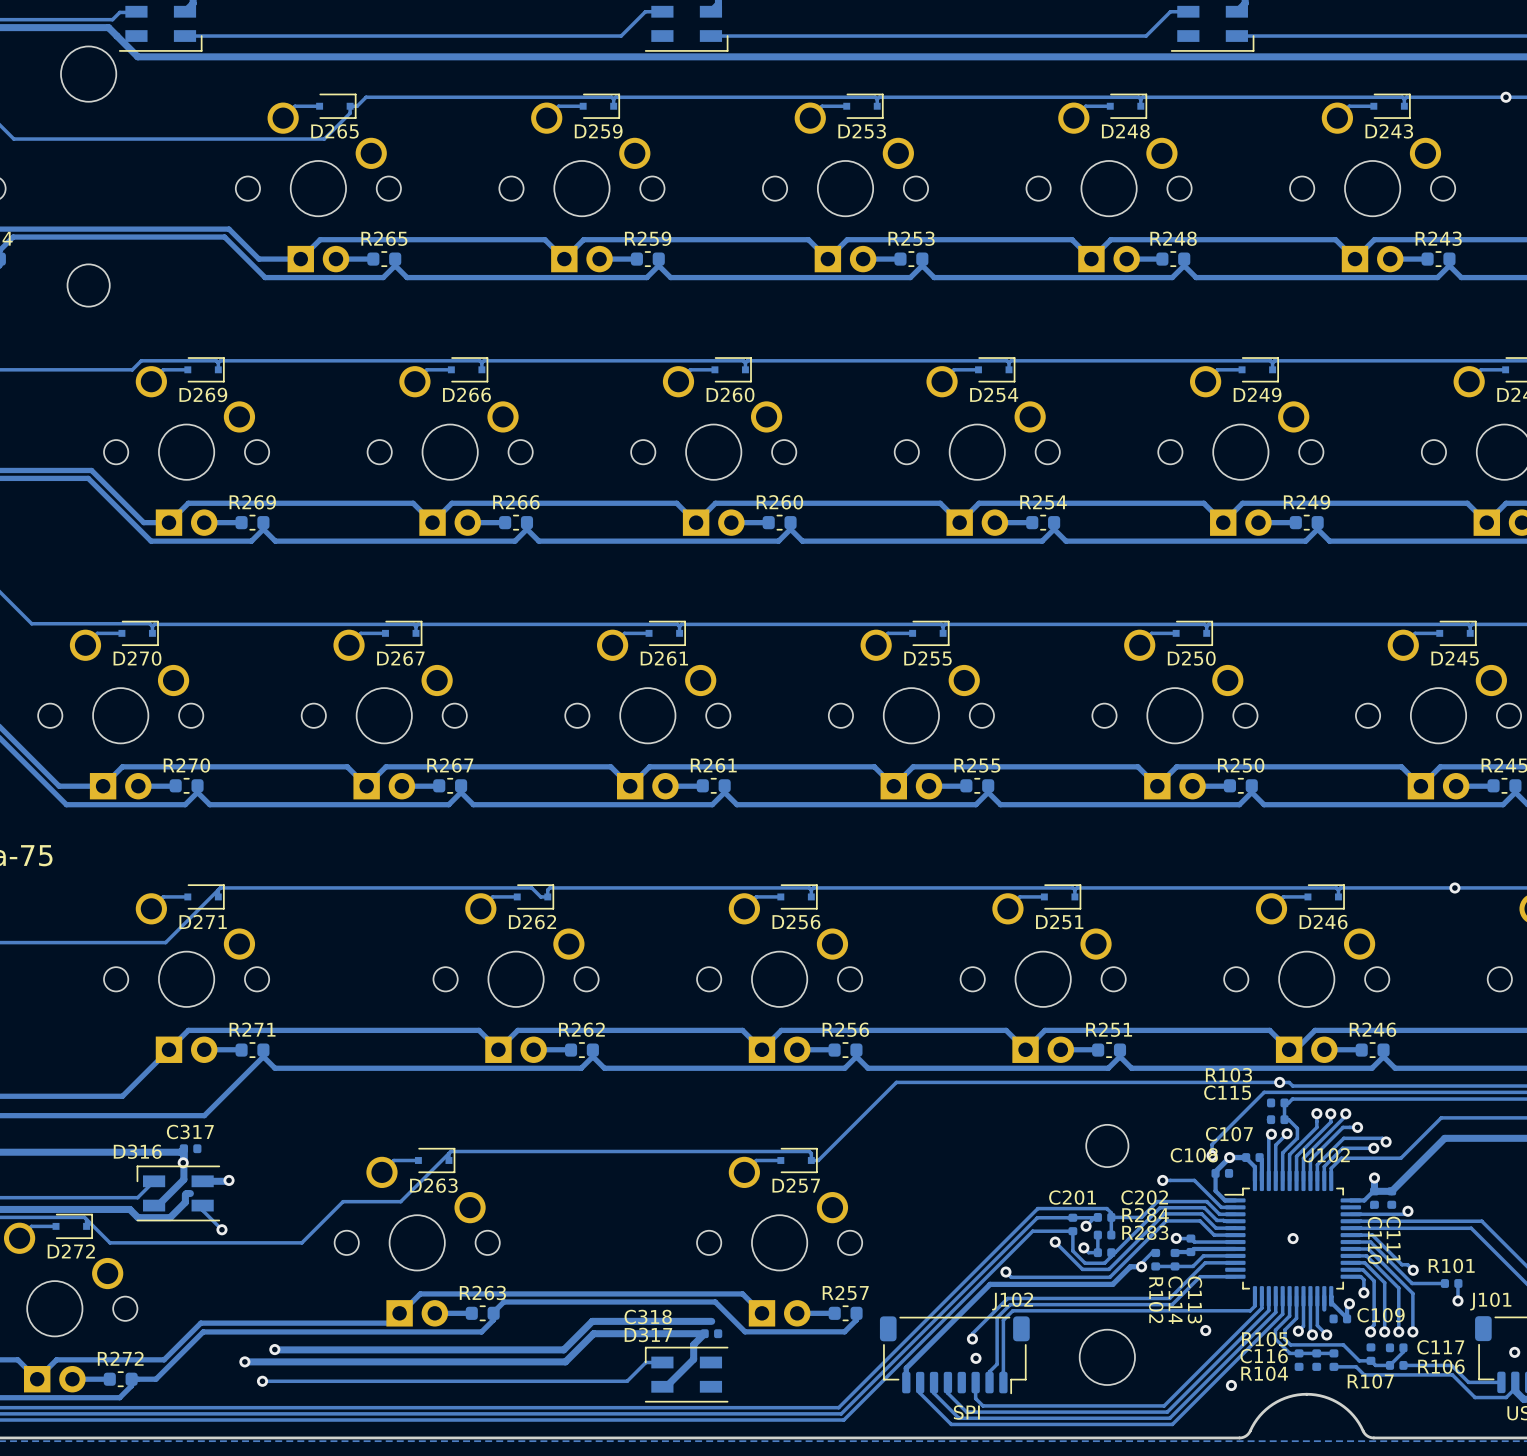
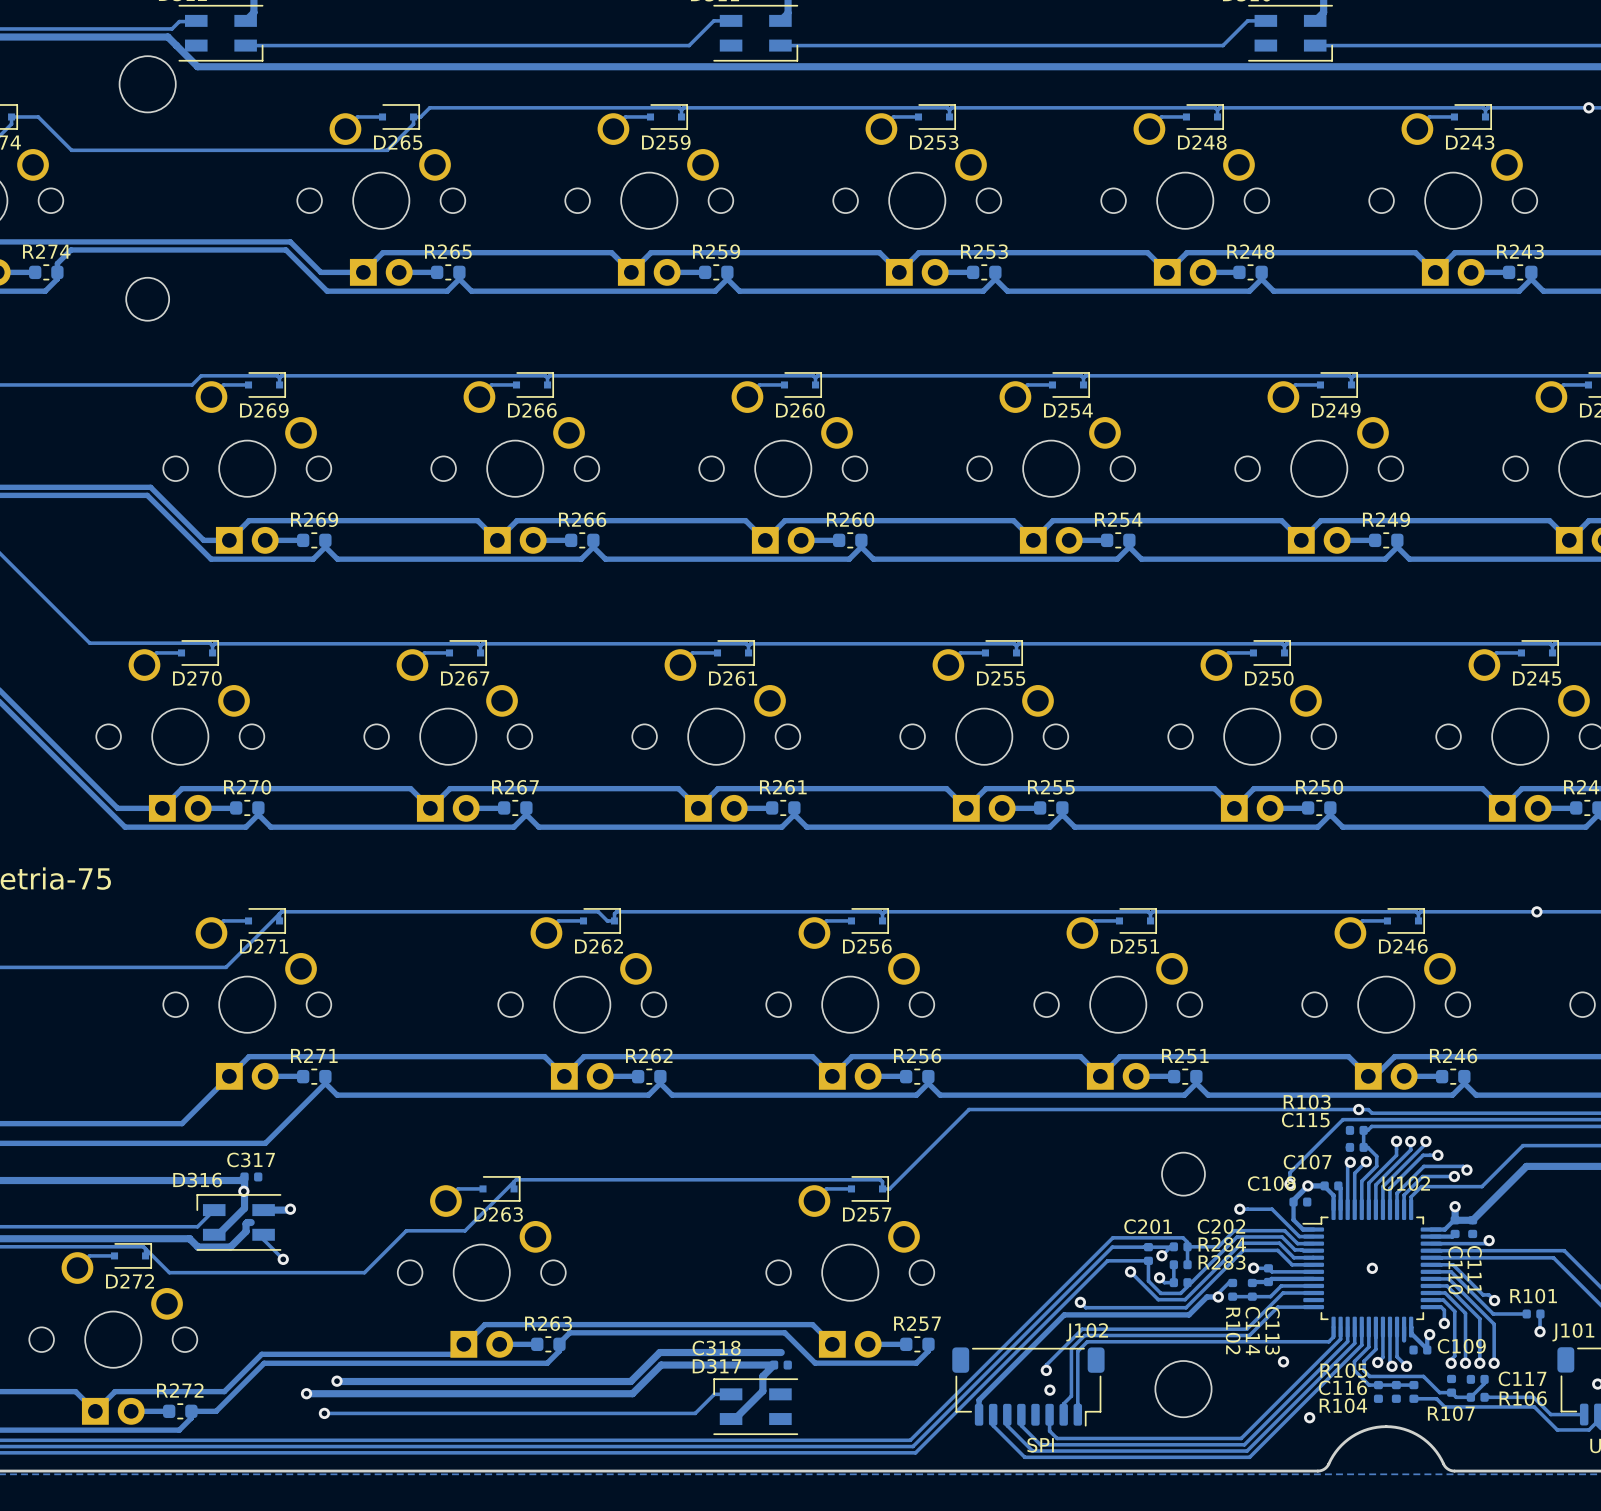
track: none -> (1455, 1233) (1452, 1236) (1431, 1236)

